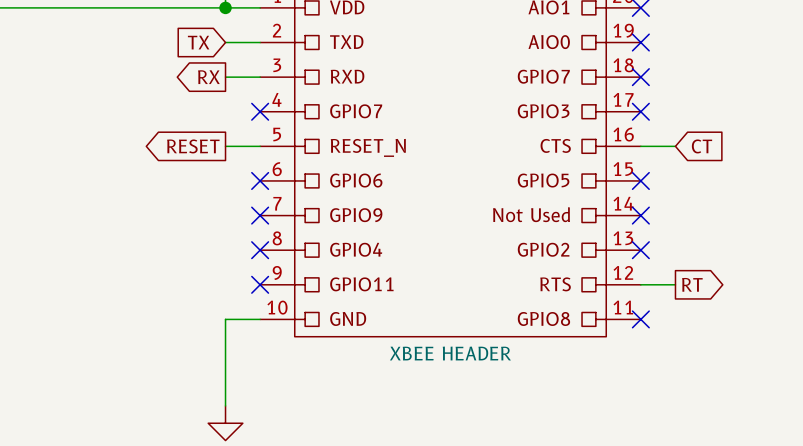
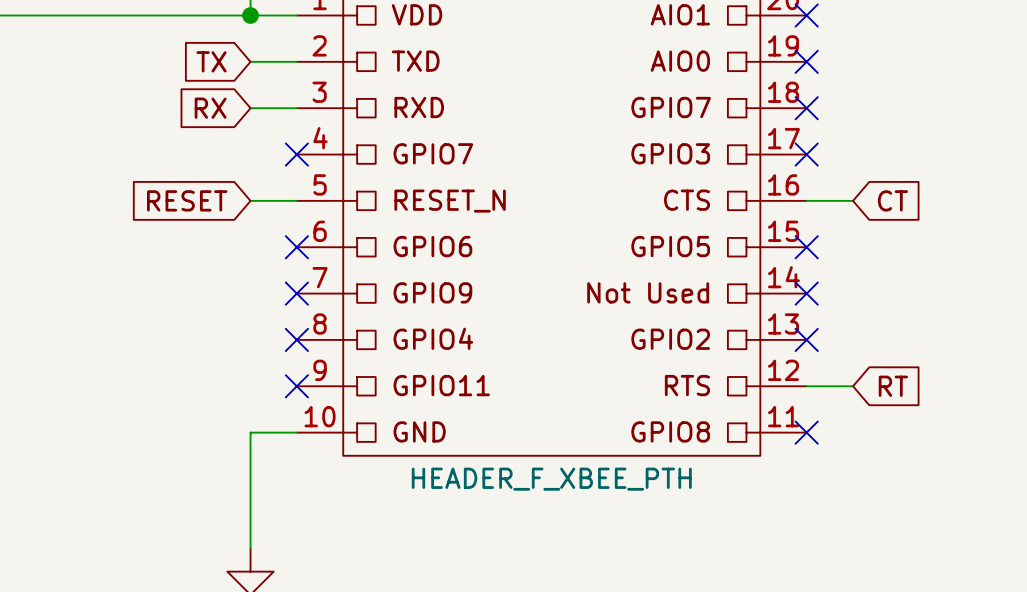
global label shape: output (208, 77) -> input (210, 108)
global label shape: output (193, 146) -> input (187, 200)
global label shape: output (692, 284) -> input (893, 386)
part value: XBEE HEADER (450, 353) -> HEADER_F_XBEE_PTH (551, 479)

